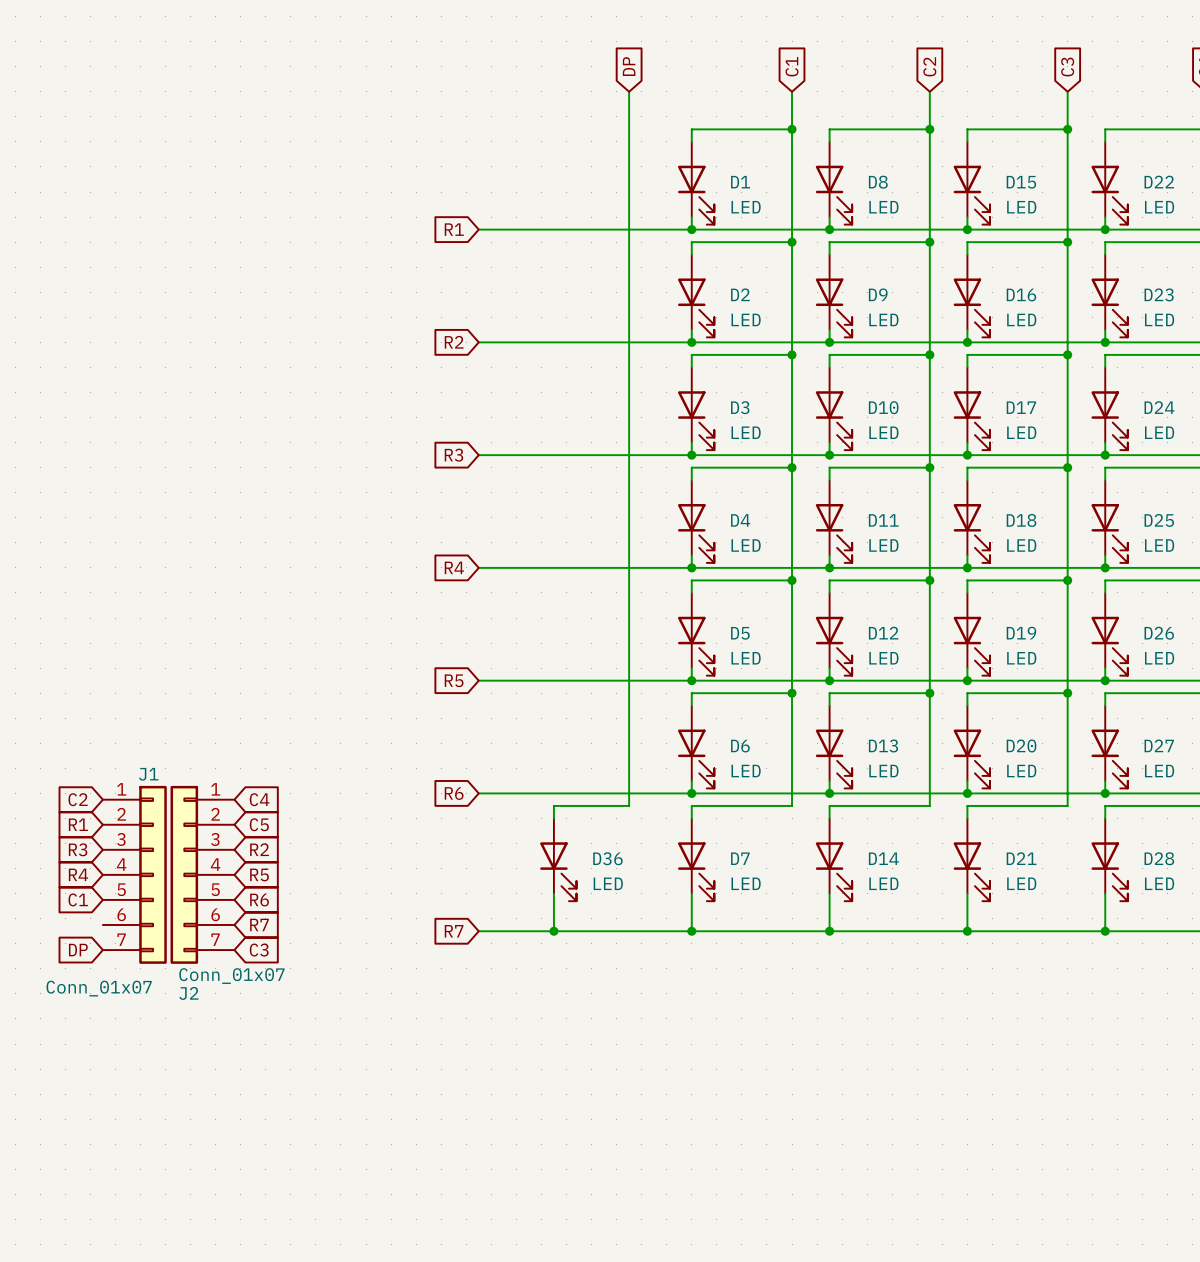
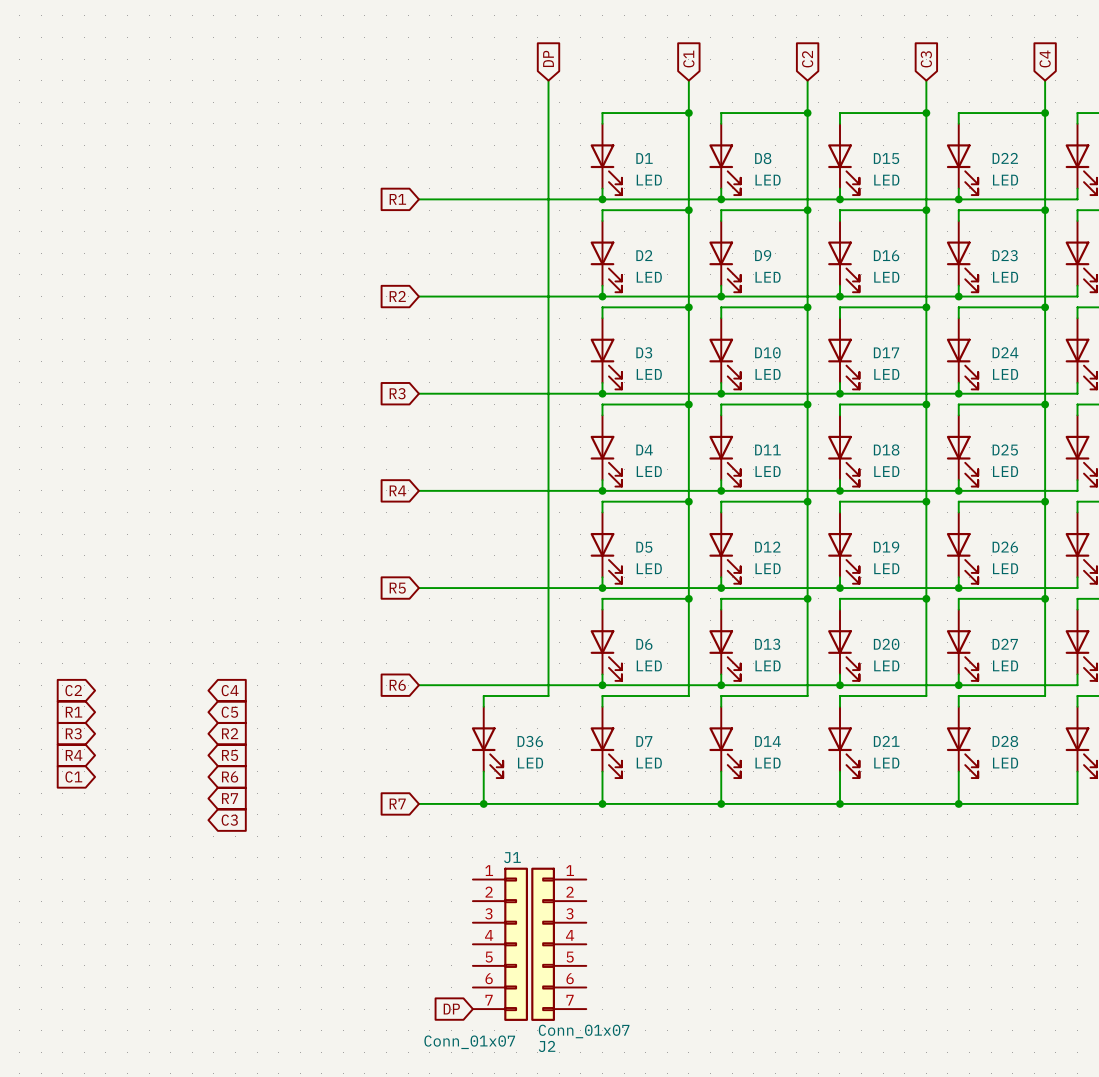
J2 position: (134, 874) -> (500, 944)
J1 position: (202, 874) -> (558, 944)
global label: DP (78, 950) -> none
global label: none -> DP (451, 1009)

